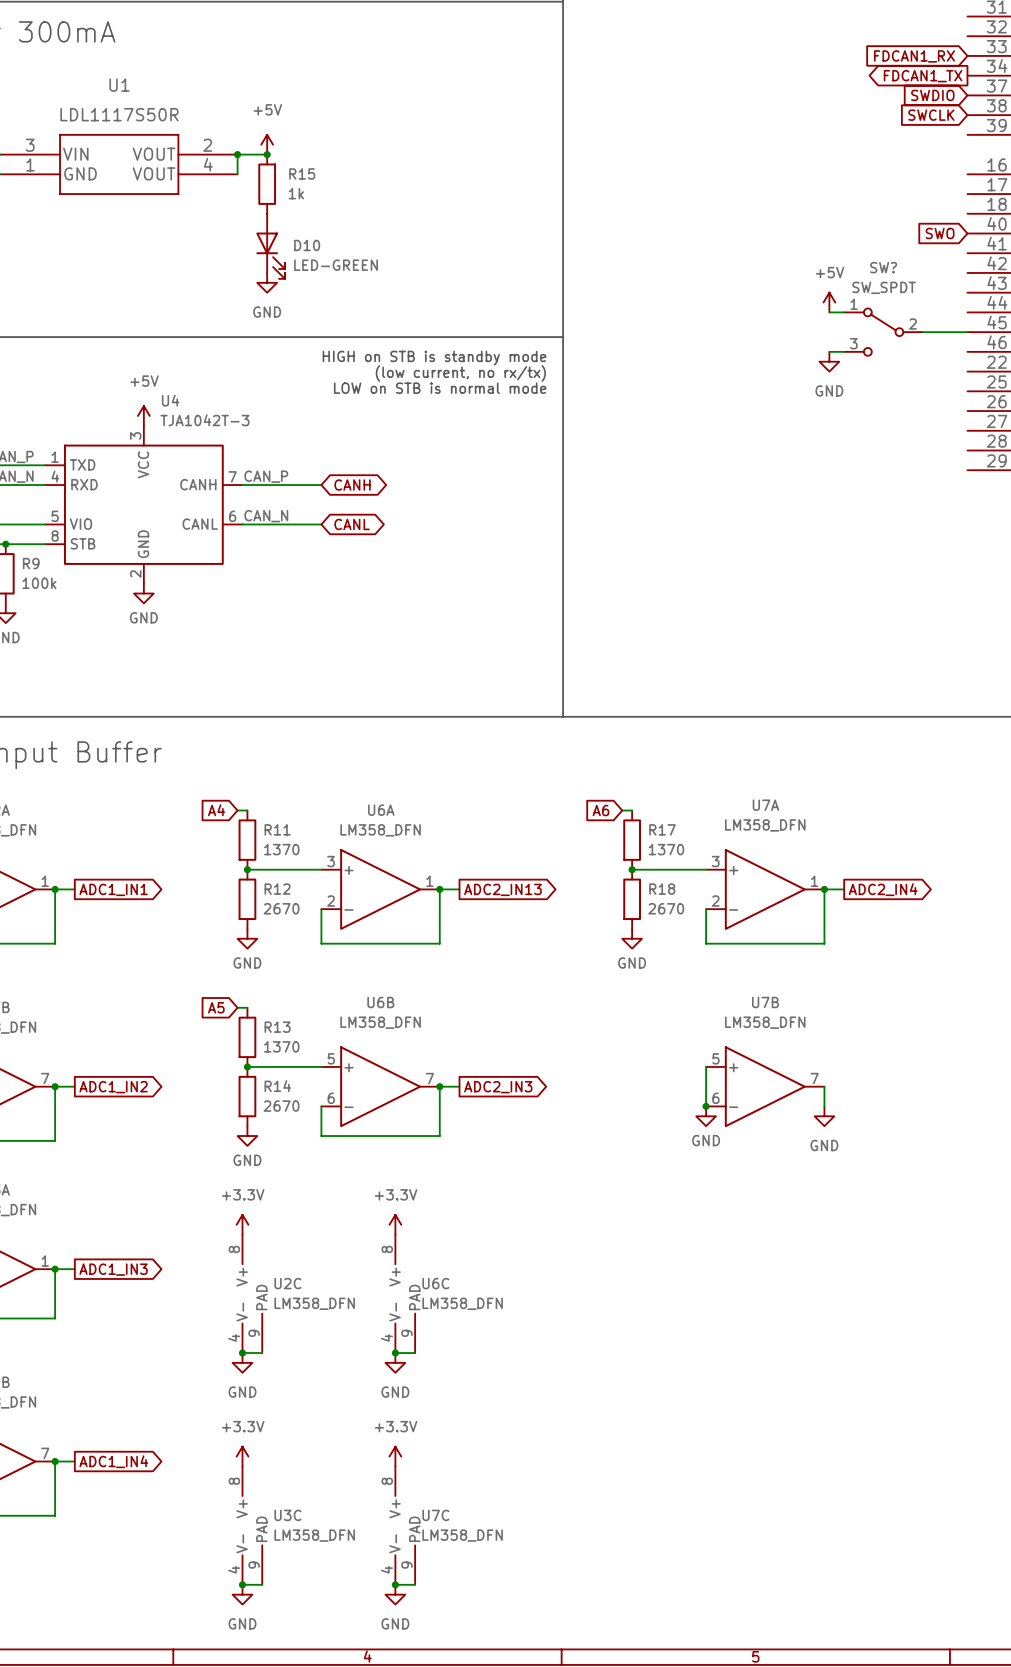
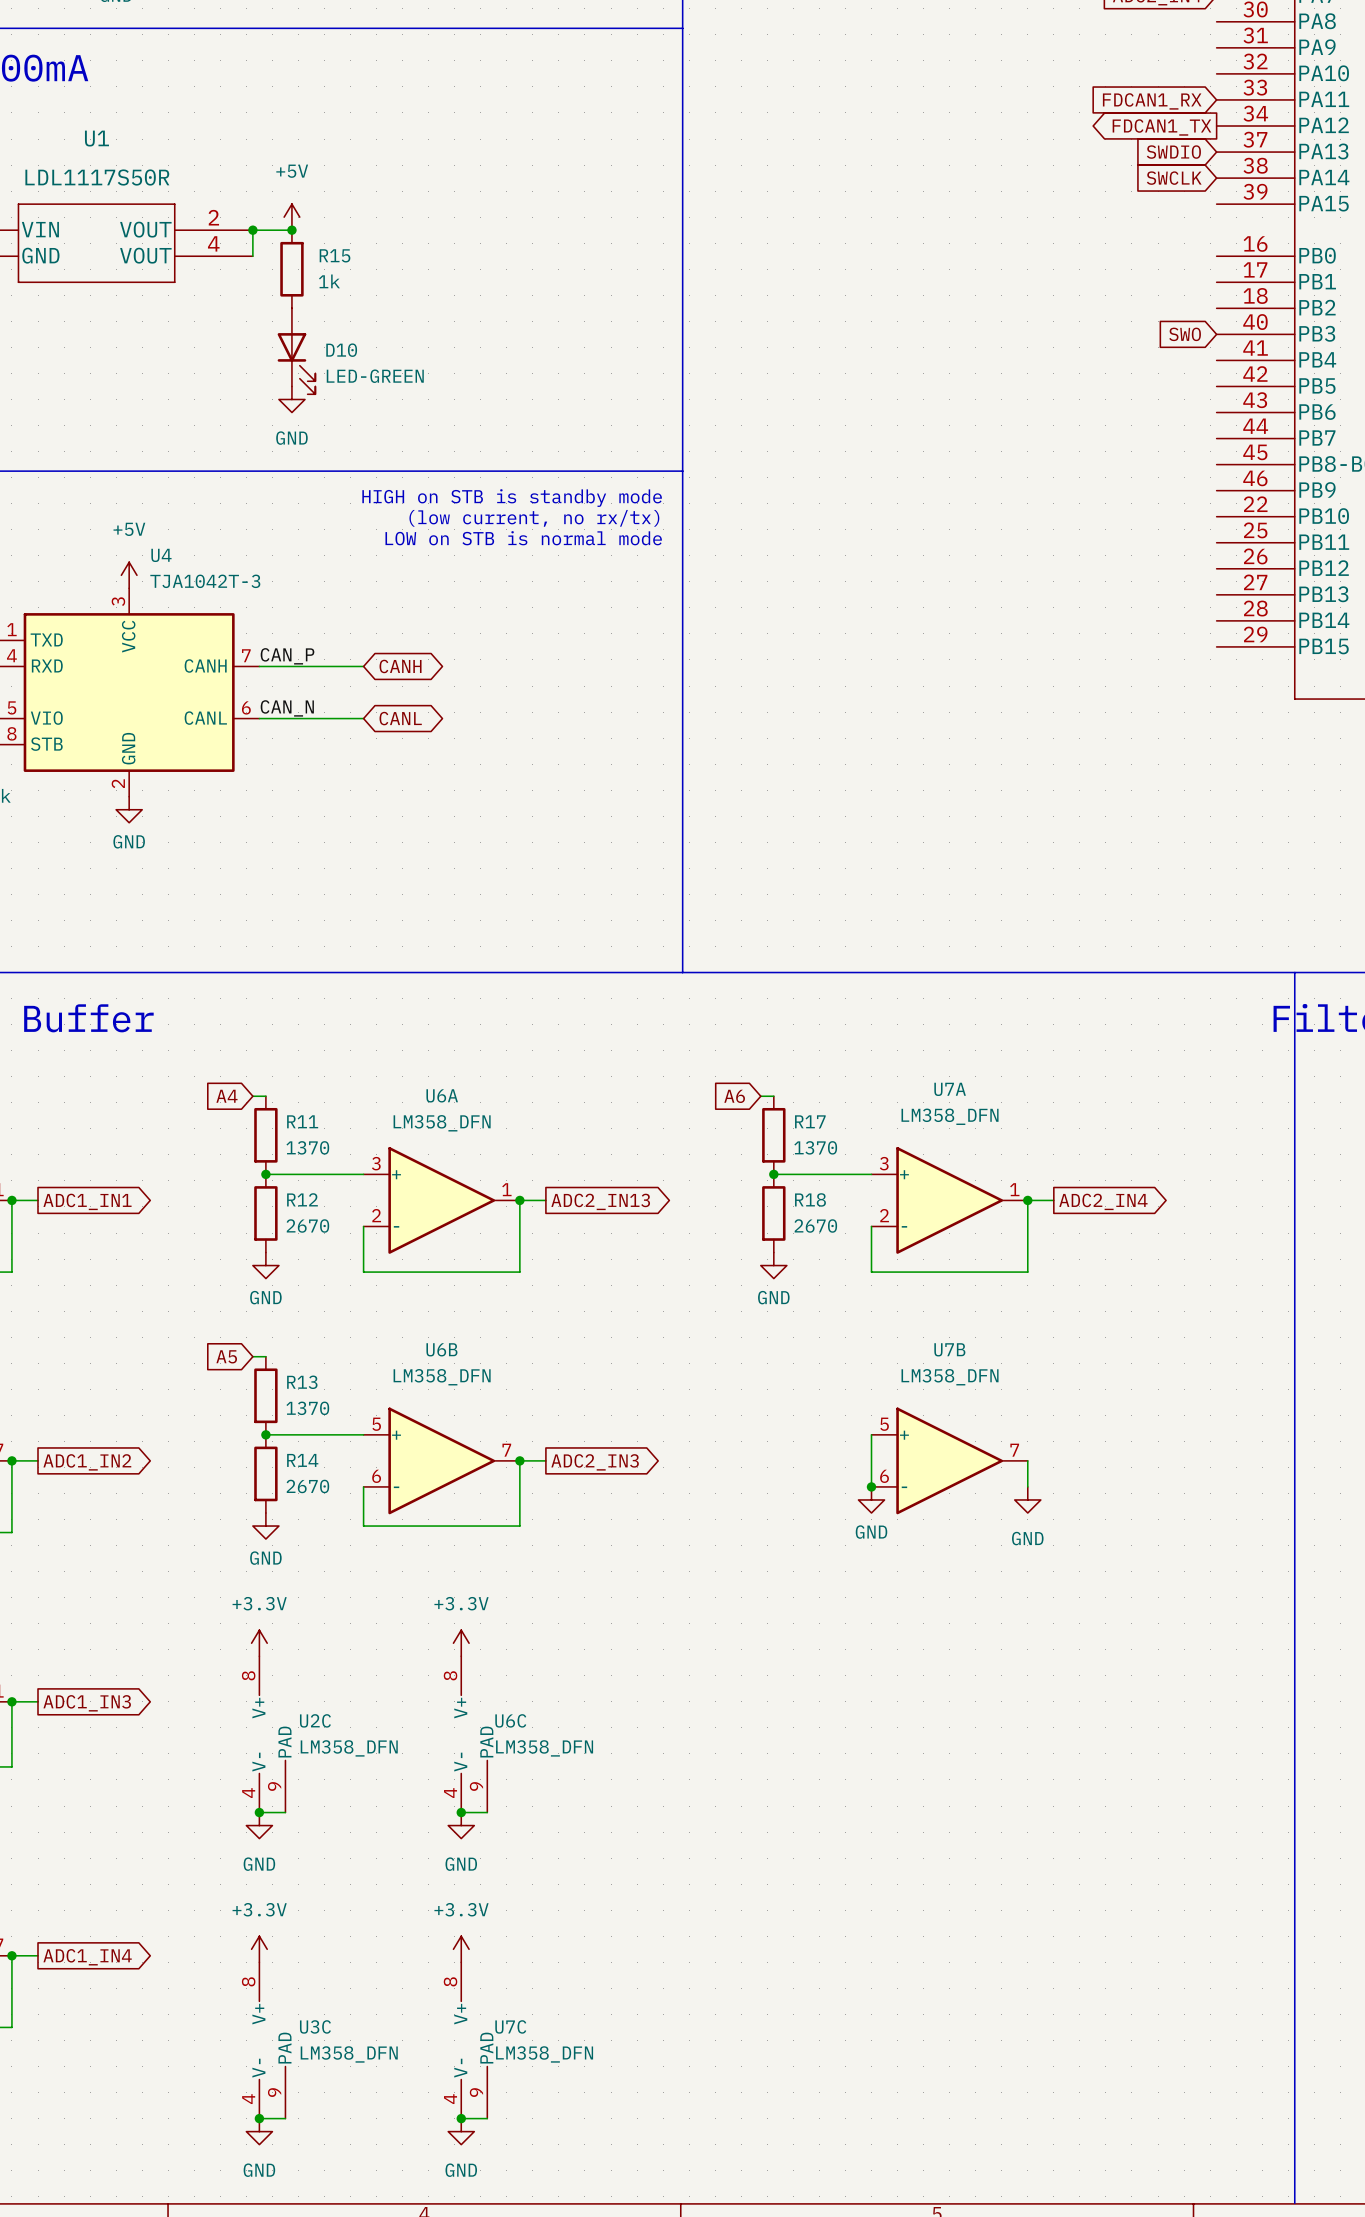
power symbol: +5V (829, 302) -> none
wire: (829, 312) (844, 312) -> none
SW?: SW_SPDT (883, 332) -> none
wire: (923, 332) (967, 332) -> none
wire: (829, 351) (844, 351) -> none
power symbol: GND (829, 361) -> none

